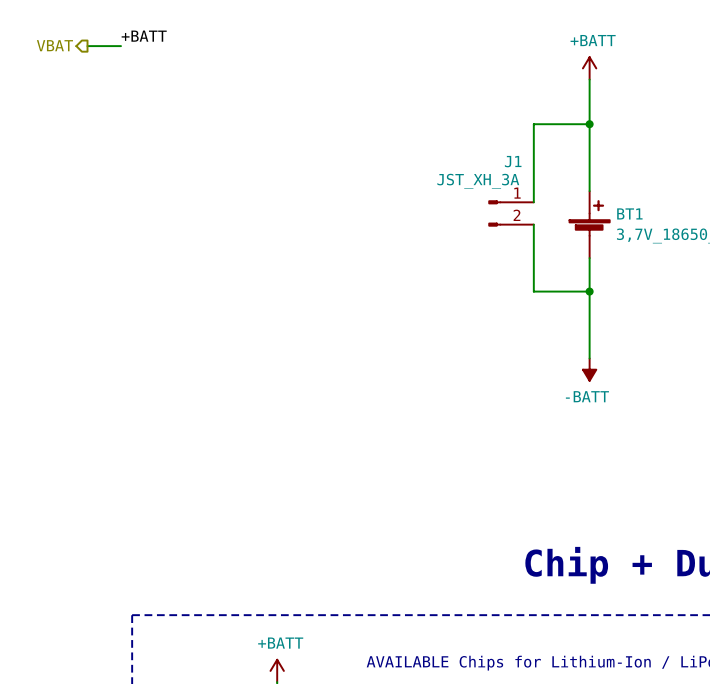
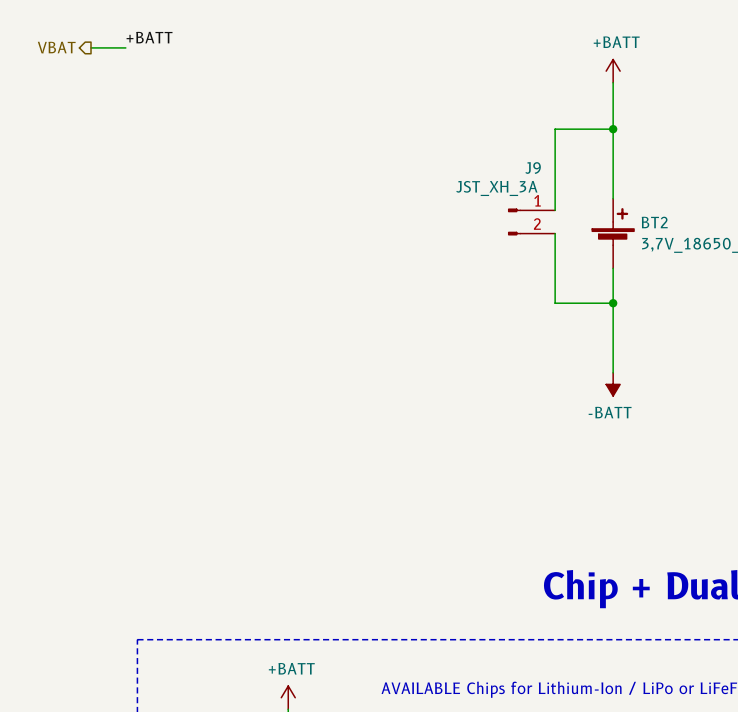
J1 name: J1 (513, 161) -> J9 (533, 168)
BT1 name: BT1 (629, 213) -> BT2 (654, 222)

